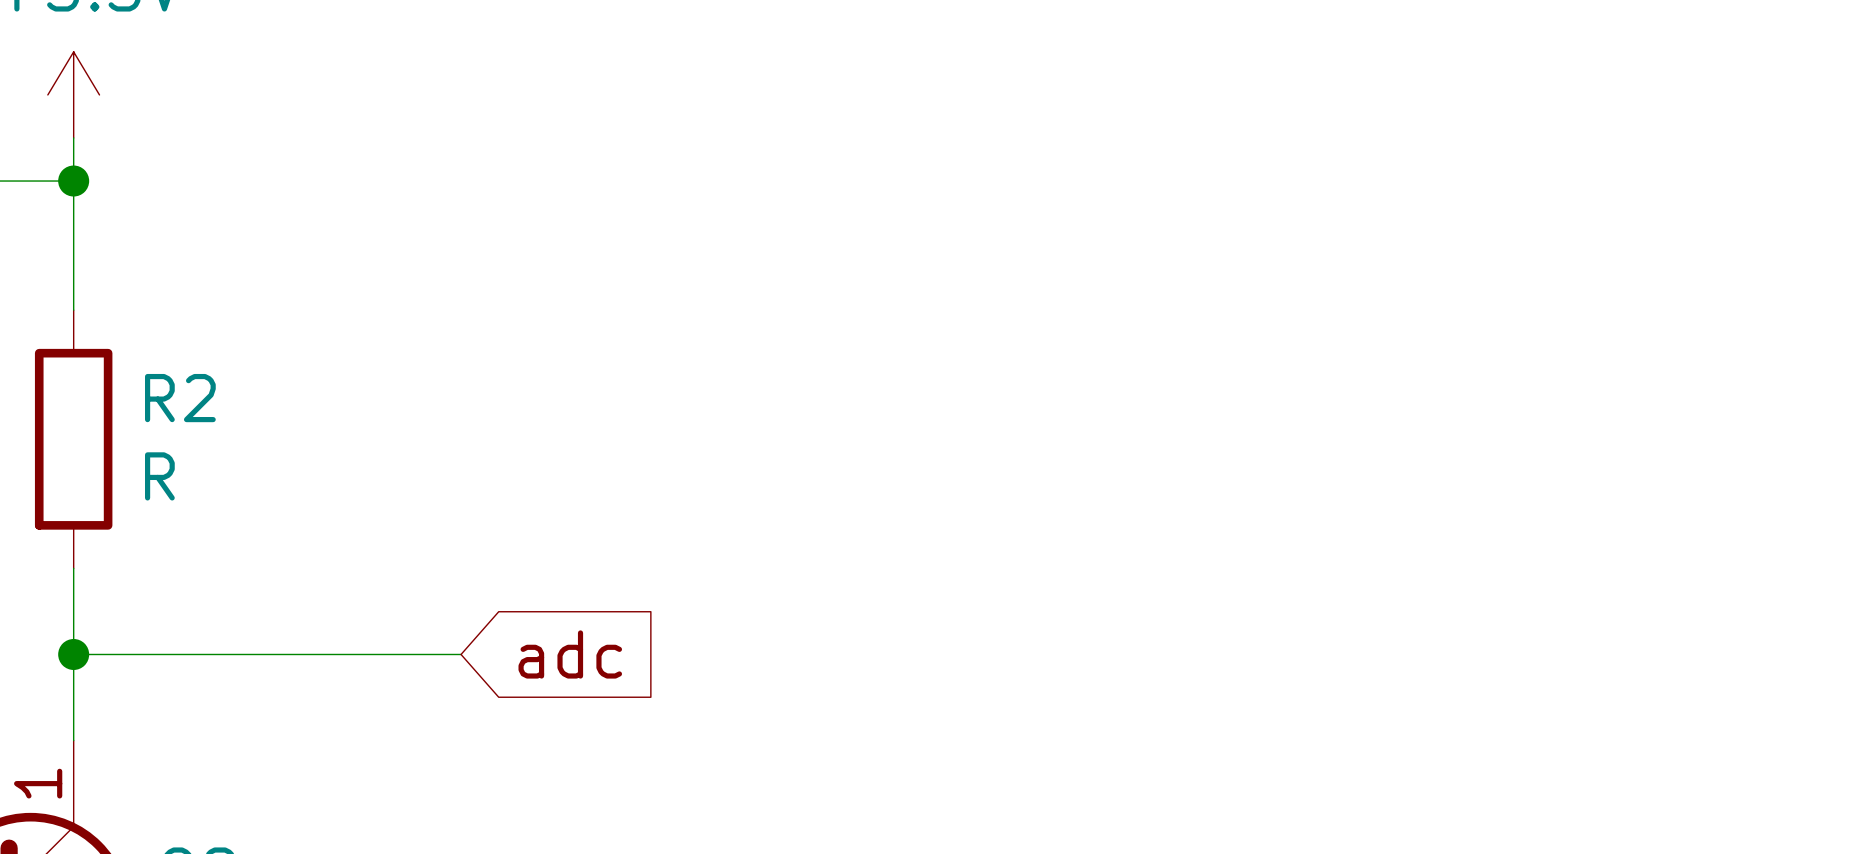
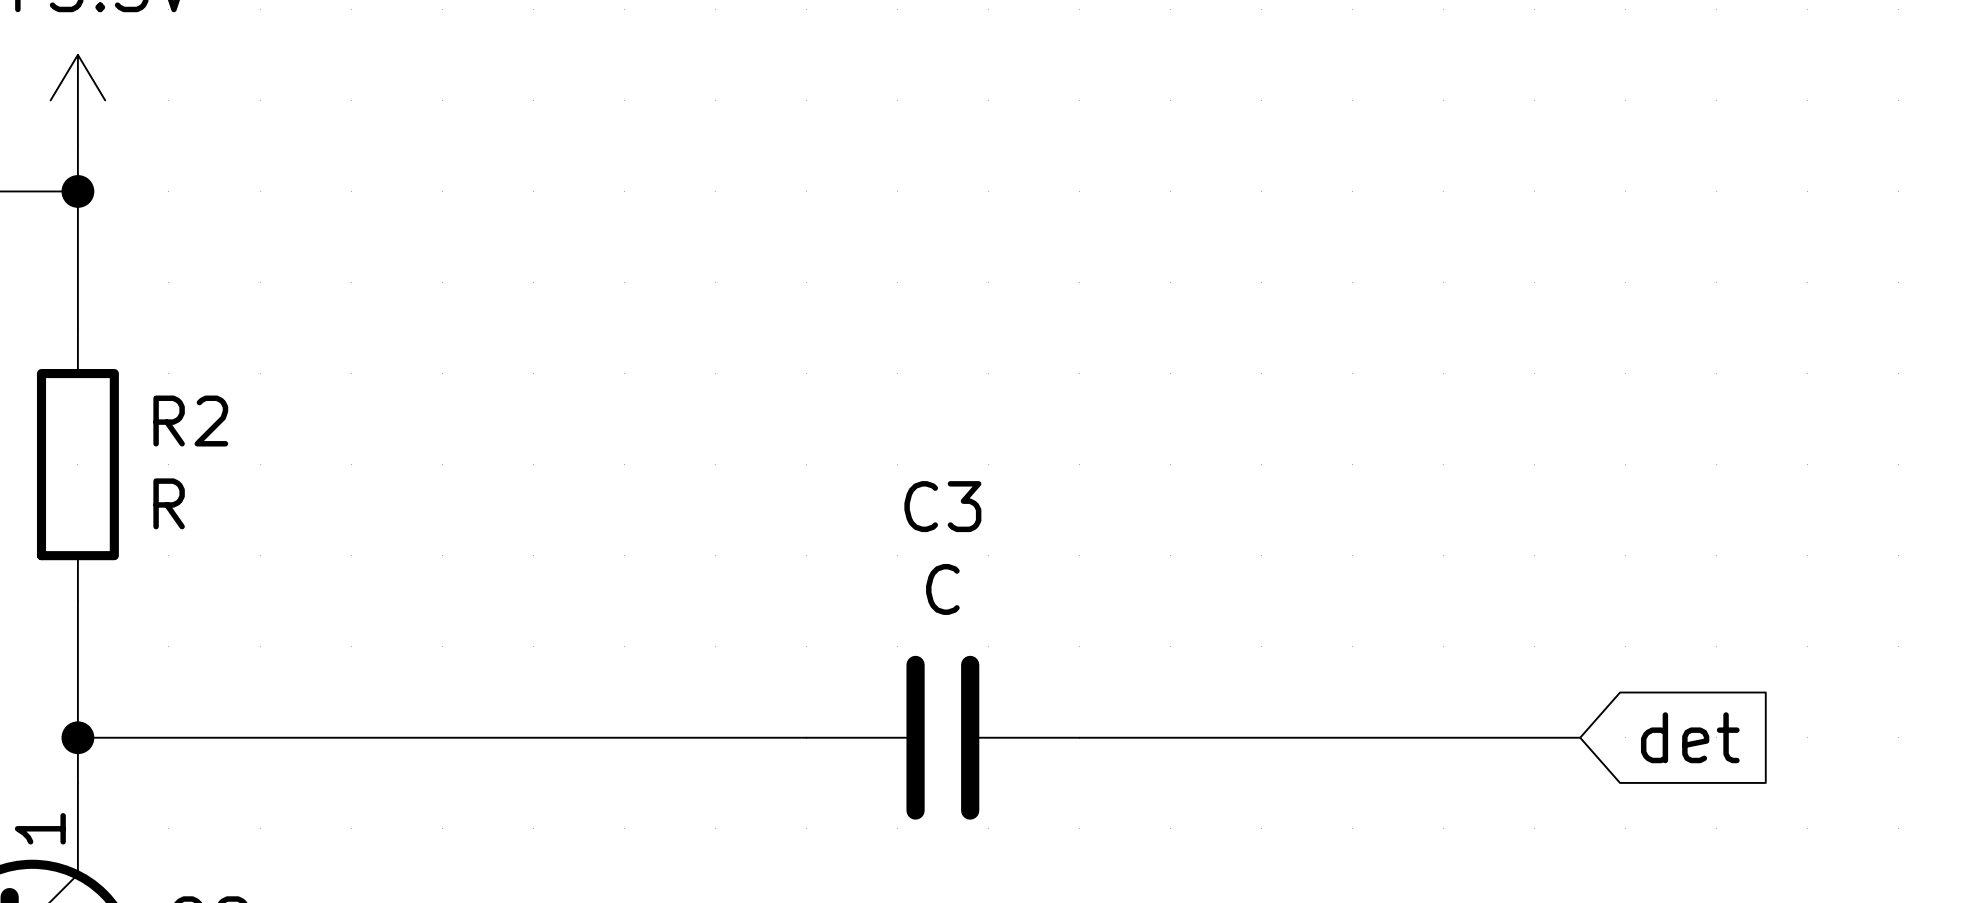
wire: (73, 654) (461, 654) -> none
junction position: (73, 654) -> (77, 737)
global label: adc (570, 654) -> none
wire: none -> (77, 737) (806, 737)
C3: none -> C (942, 737)
wire: none -> (1079, 737) (1580, 737)
global label: none -> det (1690, 737)

